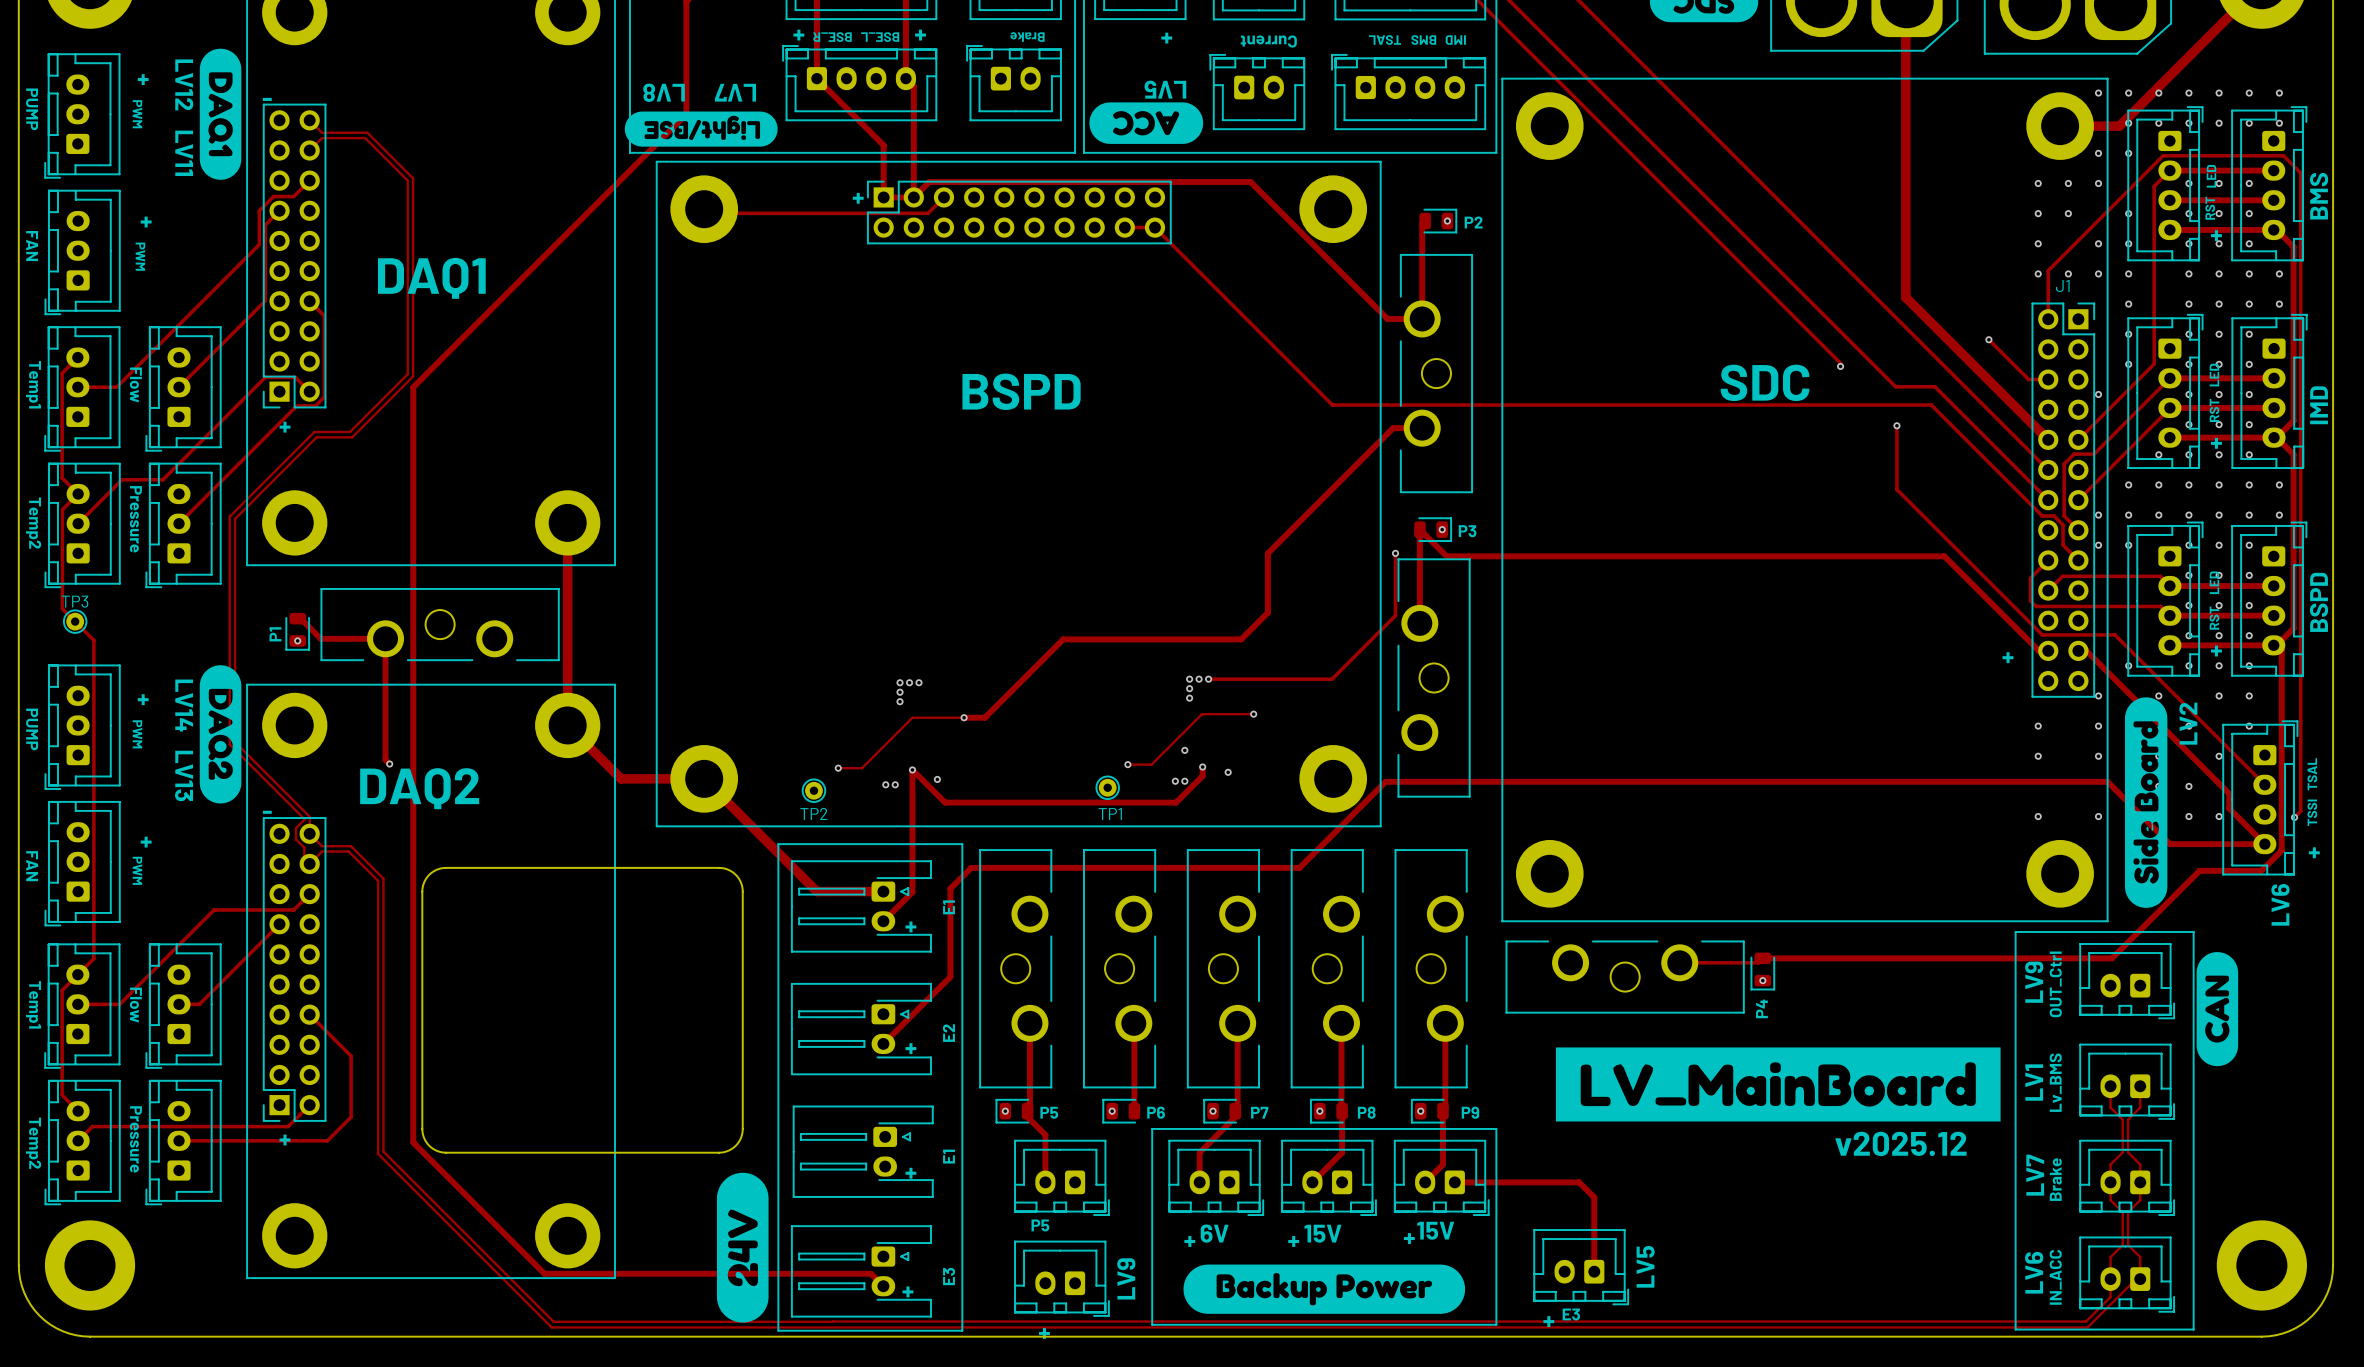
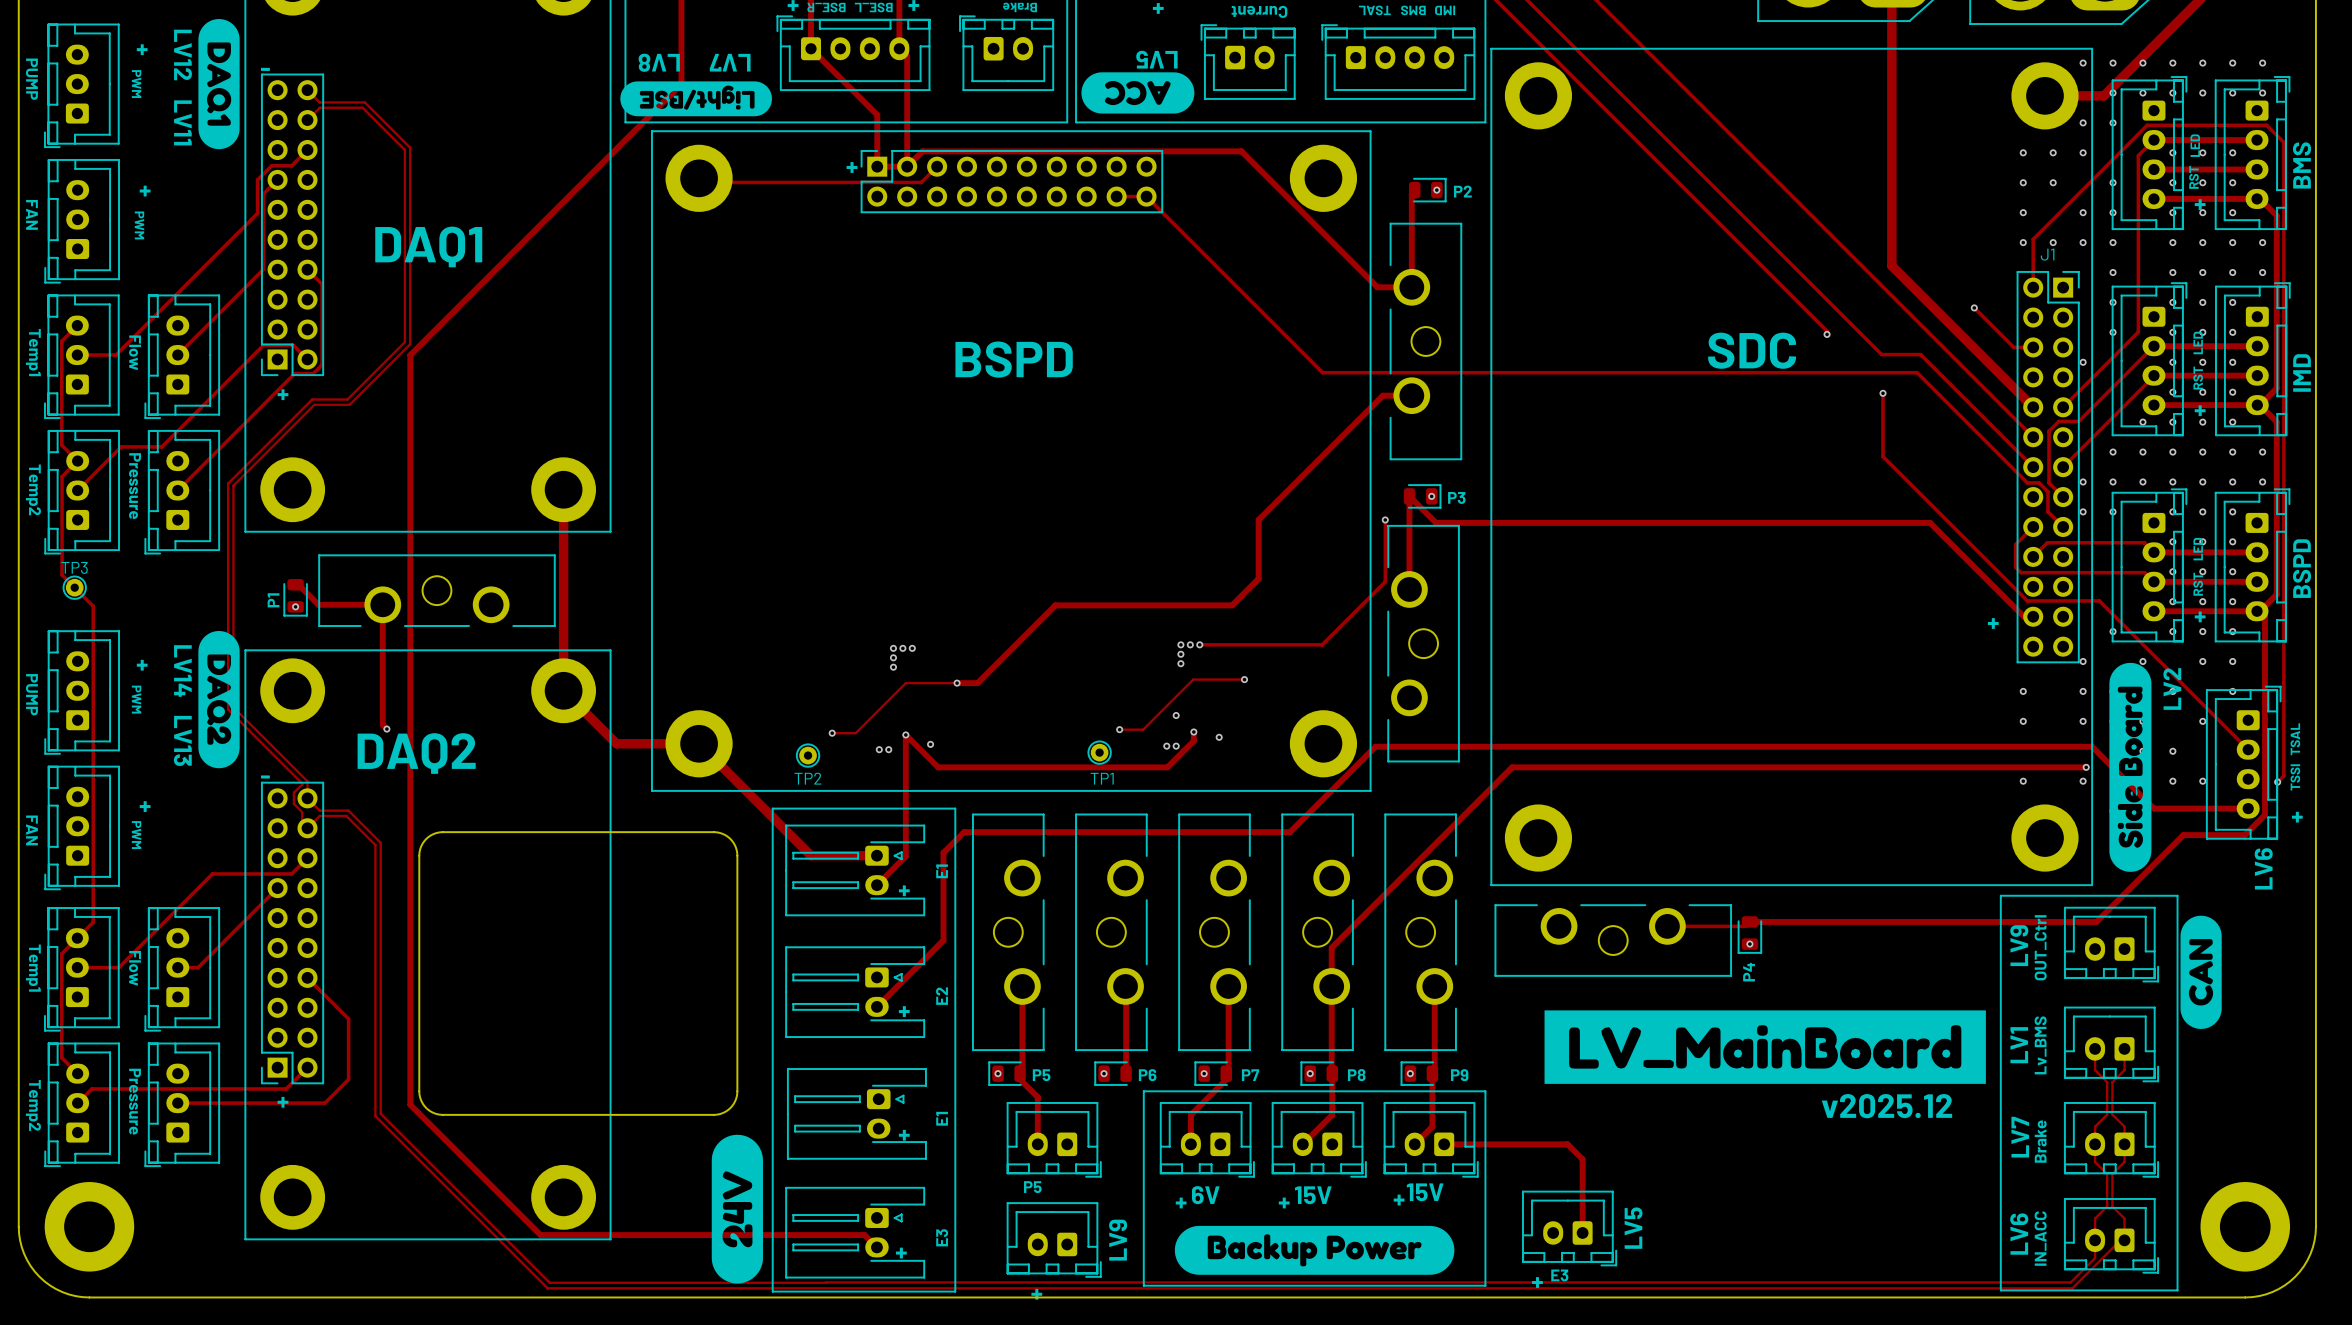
track: (2078, 650) (2086, 650) (2229, 793) (2229, 808) (2264, 844) -> none
track: none -> (2086, 767) (1512, 767) (1331, 947) (1331, 986)
via: none -> (2086, 767)

